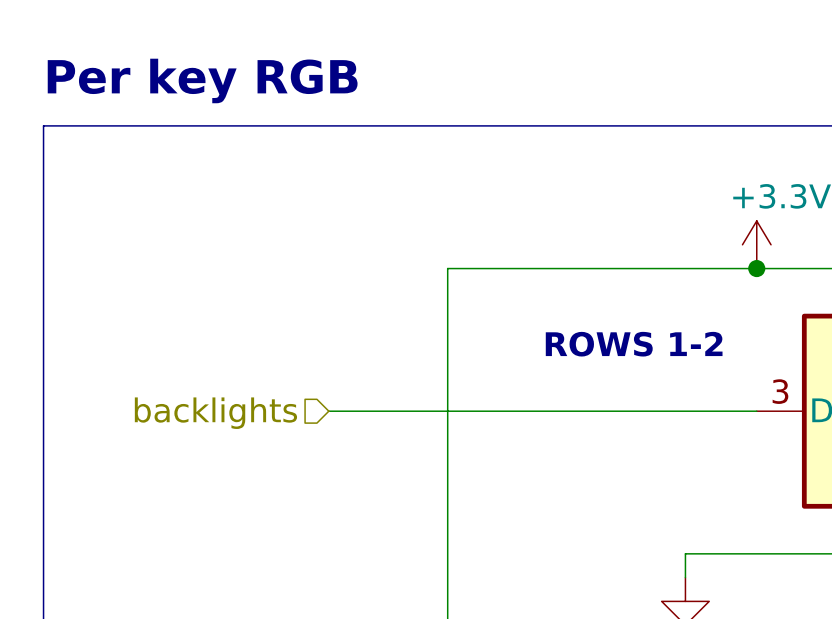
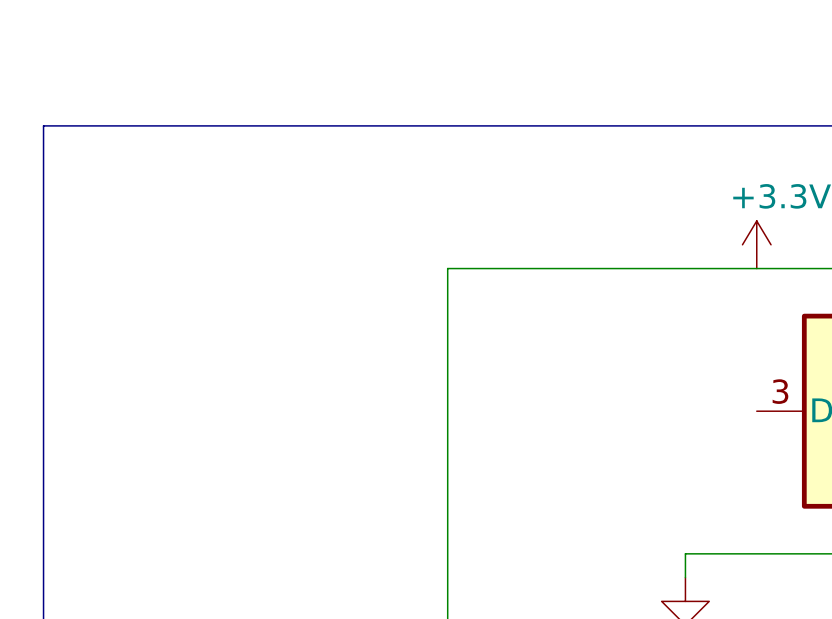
text: Per key RGB (202, 80) -> none
junction: (756, 268) -> none
text: ROWS 1-2 (634, 344) -> none
wire: (328, 411) (756, 411) -> none
hierarchical label: backlights (215, 413) -> none

